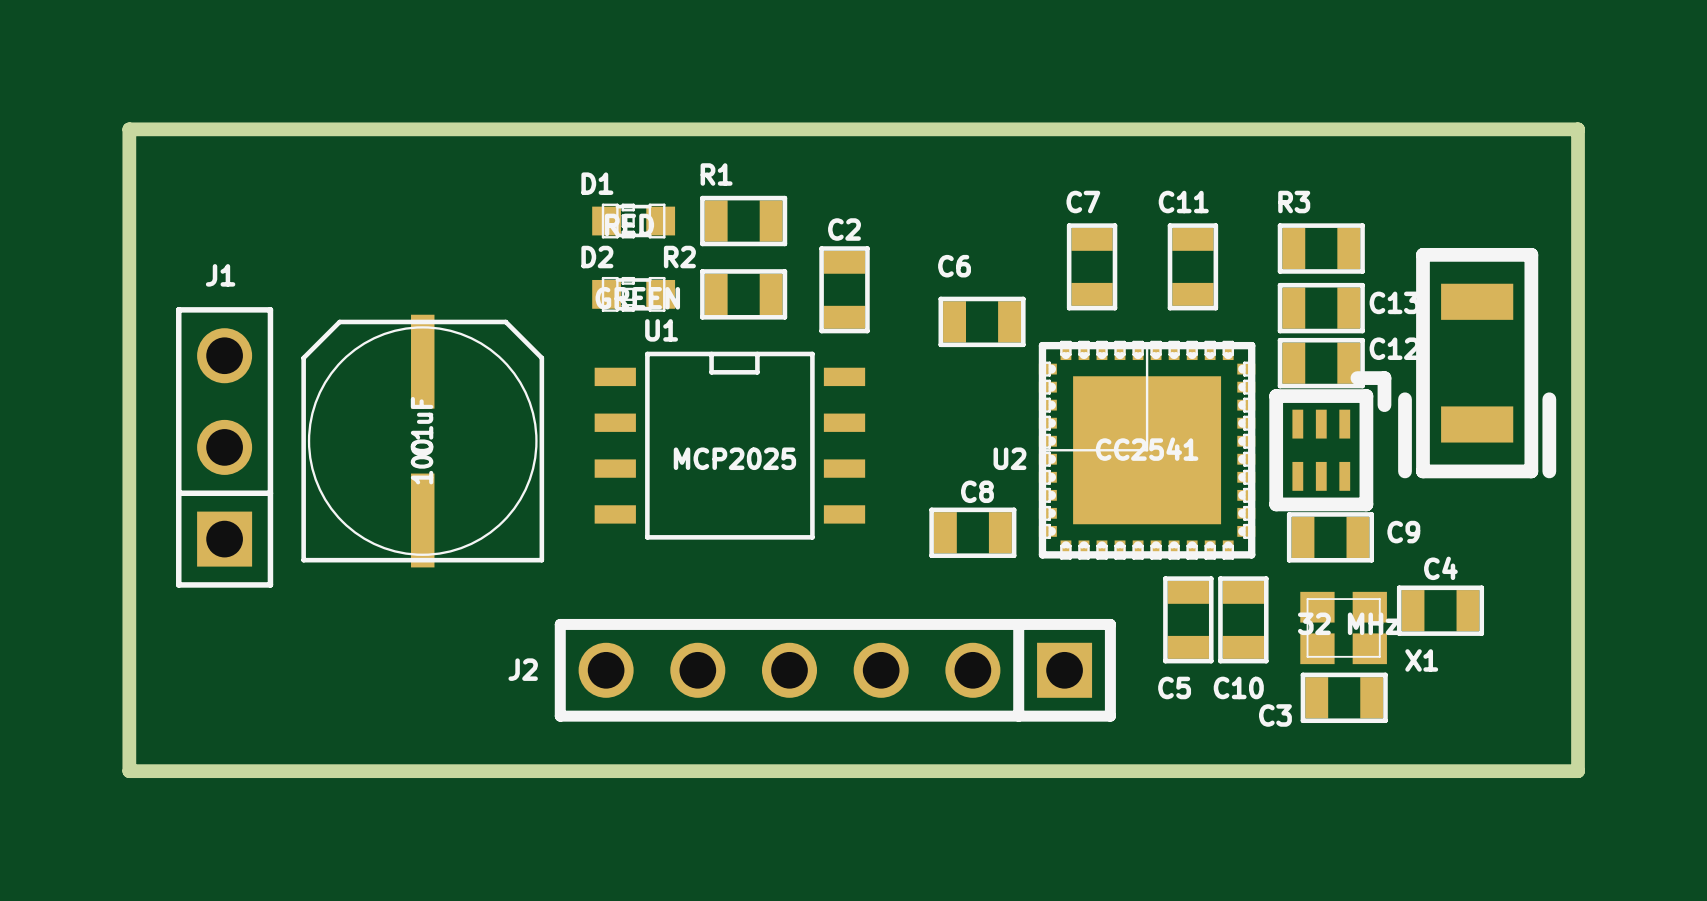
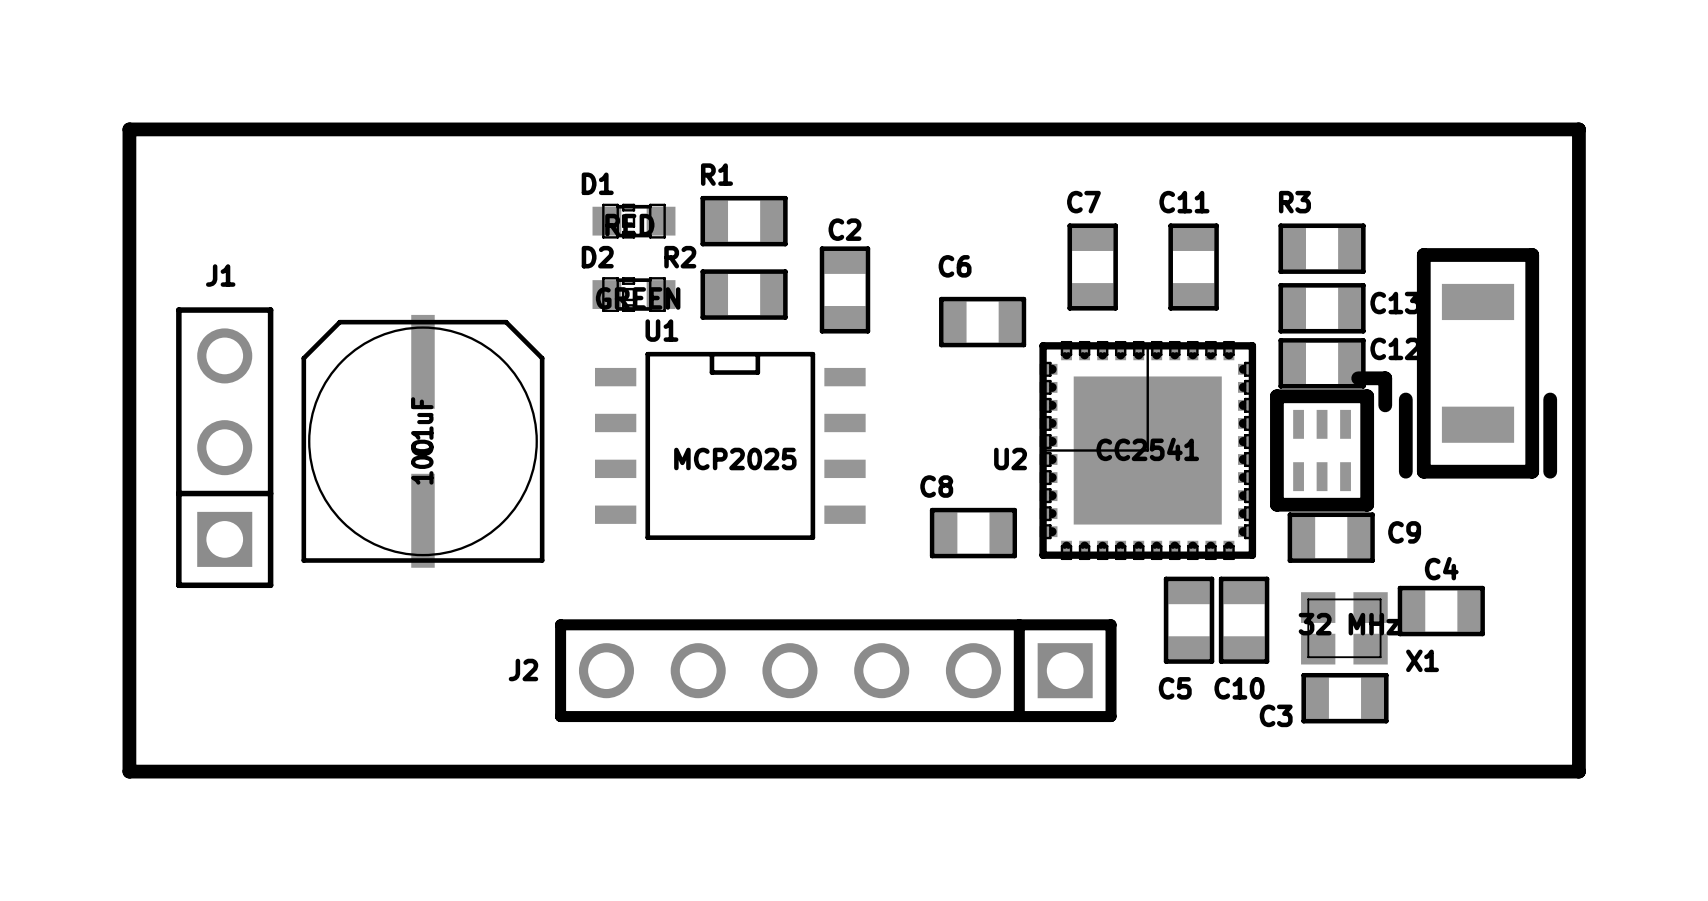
C8 name position: C8 (977, 491) -> C8 (936, 486)

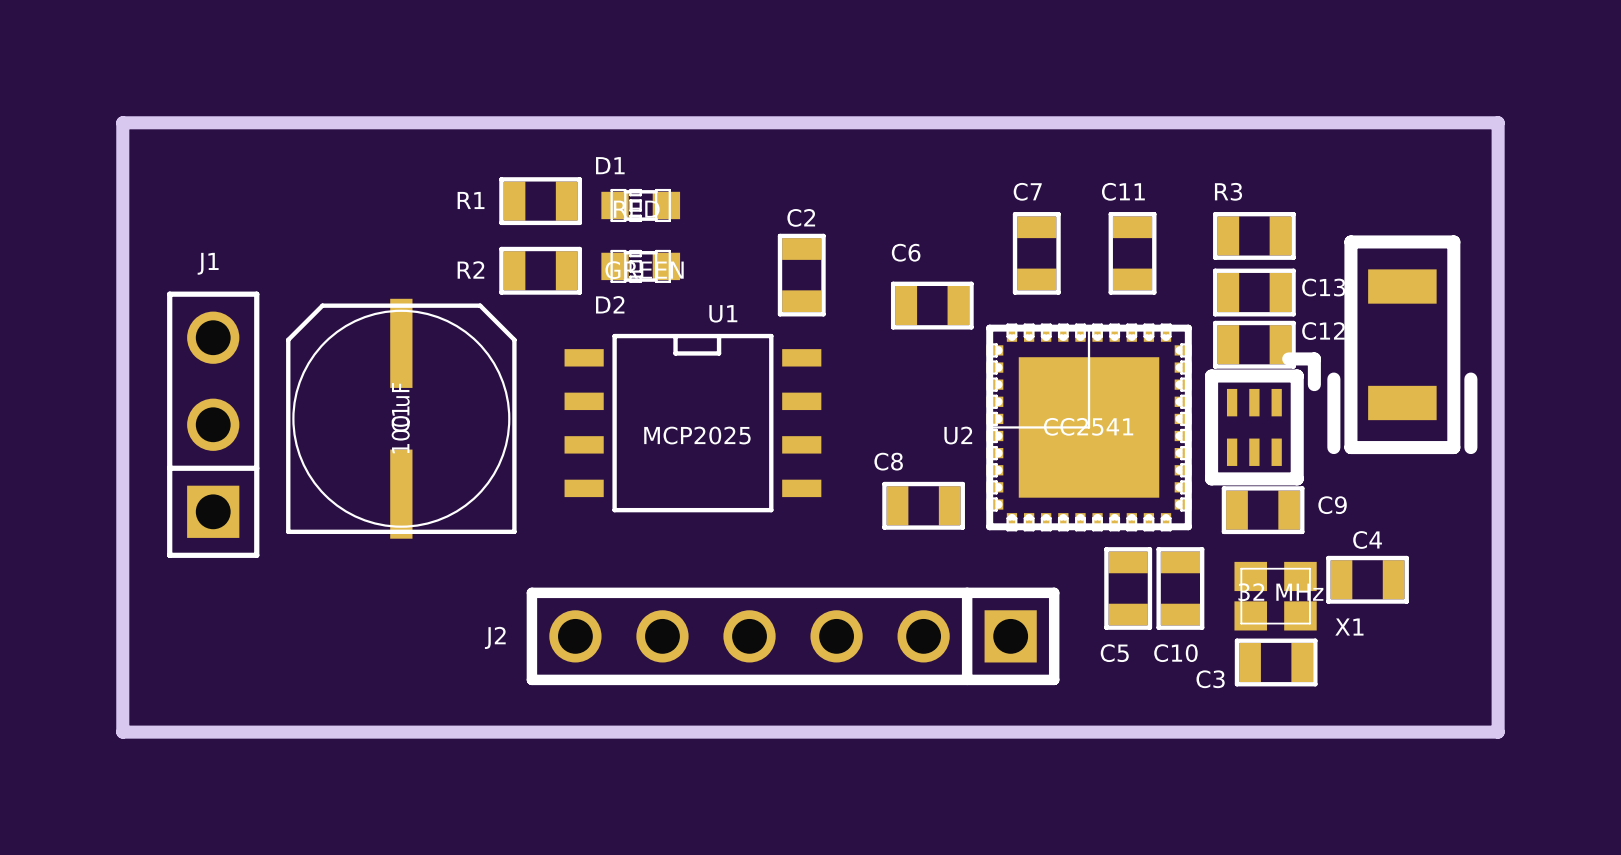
R1 name position: R1 (716, 174) -> R1 (471, 200)
D1 name position: D1 (597, 183) -> D1 (610, 165)
D1 position: (633, 221) -> (640, 205)
R1 position: (744, 221) -> (540, 201)
D2 name position: D2 (597, 257) -> D2 (610, 304)
R2 name position: R2 (680, 257) -> R2 (470, 269)
D2 position: (633, 294) -> (640, 266)
R2 position: (744, 294) -> (540, 270)
U1 name position: U1 (661, 330) -> U1 (723, 313)

